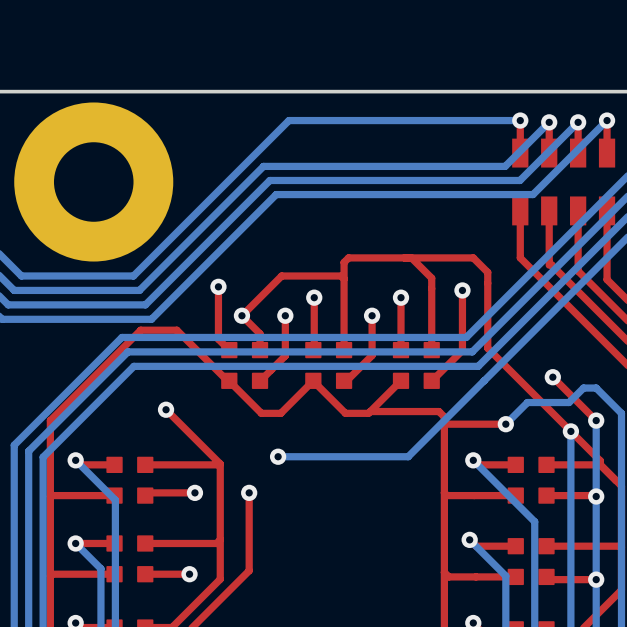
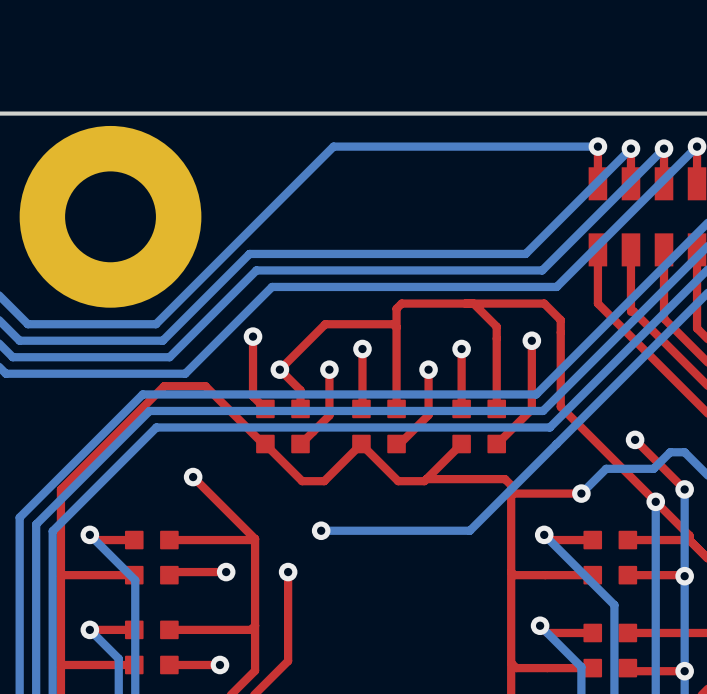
bottom track: (505, 166) (263, 166) (215, 214) -> (580, 199) (525, 253) (249, 253)
bottom track: (520, 180) (269, 180) (221, 228) -> (597, 215) (542, 270) (256, 270)
bottom track: (533, 194) (276, 194) (151, 319) -> (612, 231) (556, 286) (272, 286) (185, 373) (176, 373)

